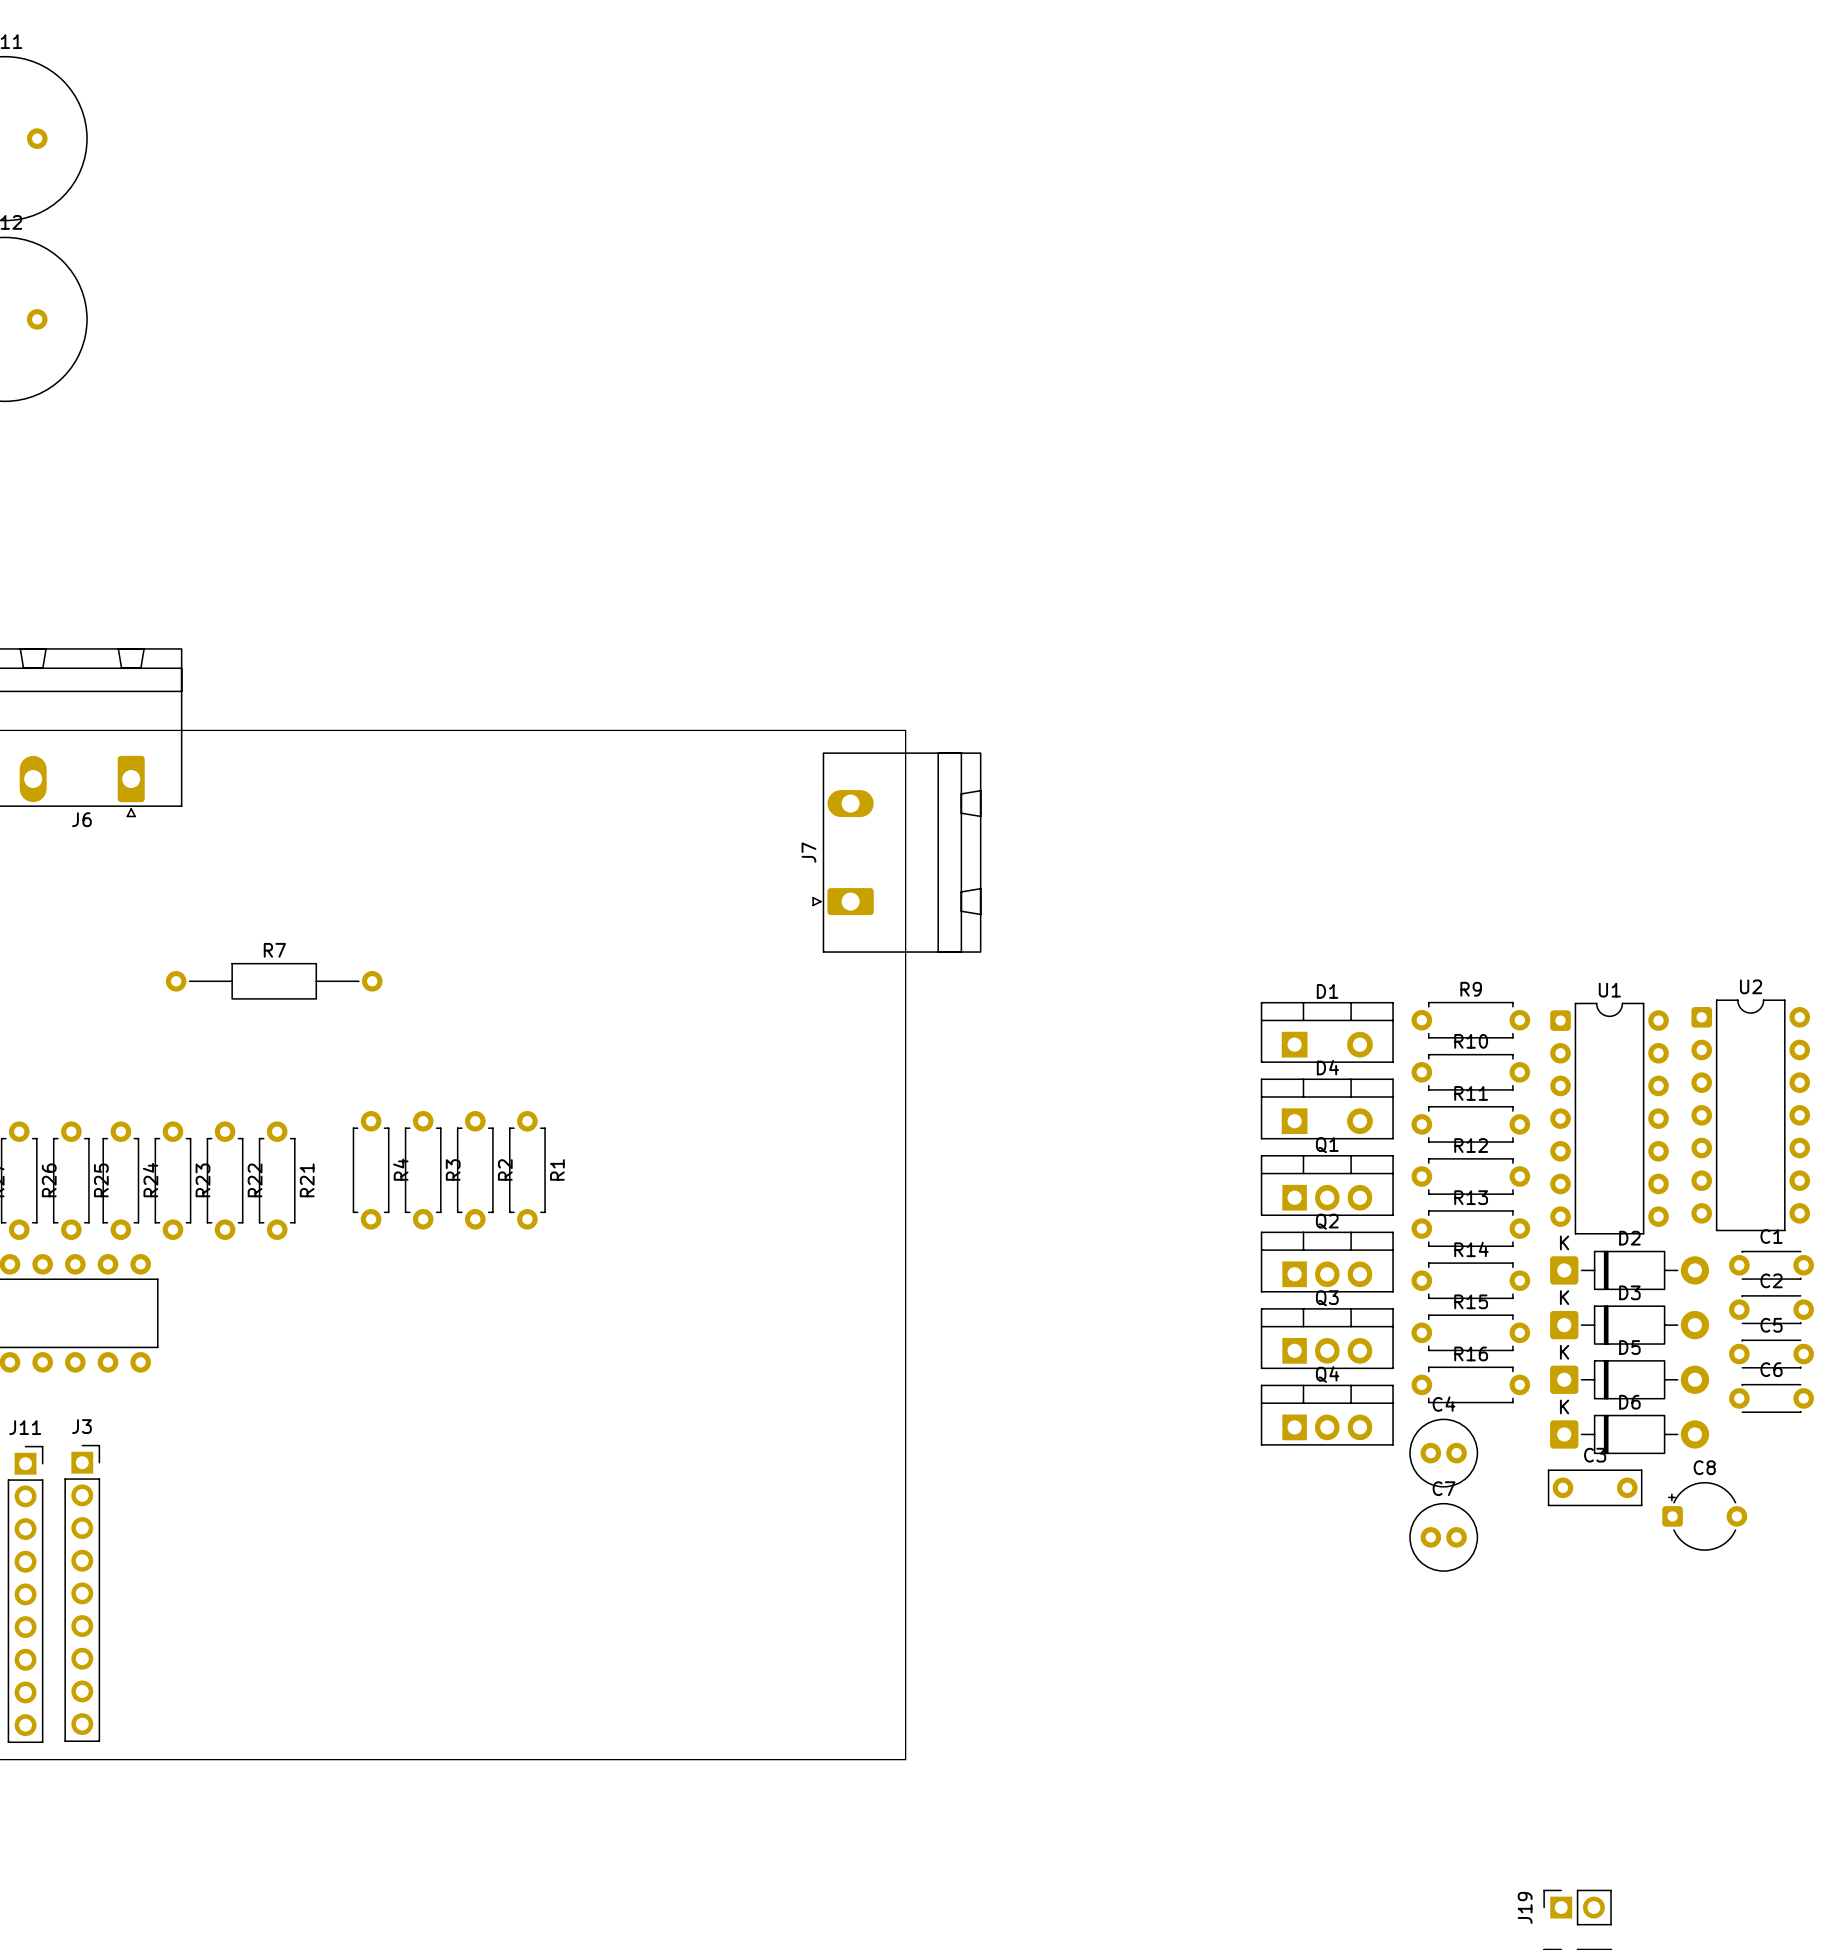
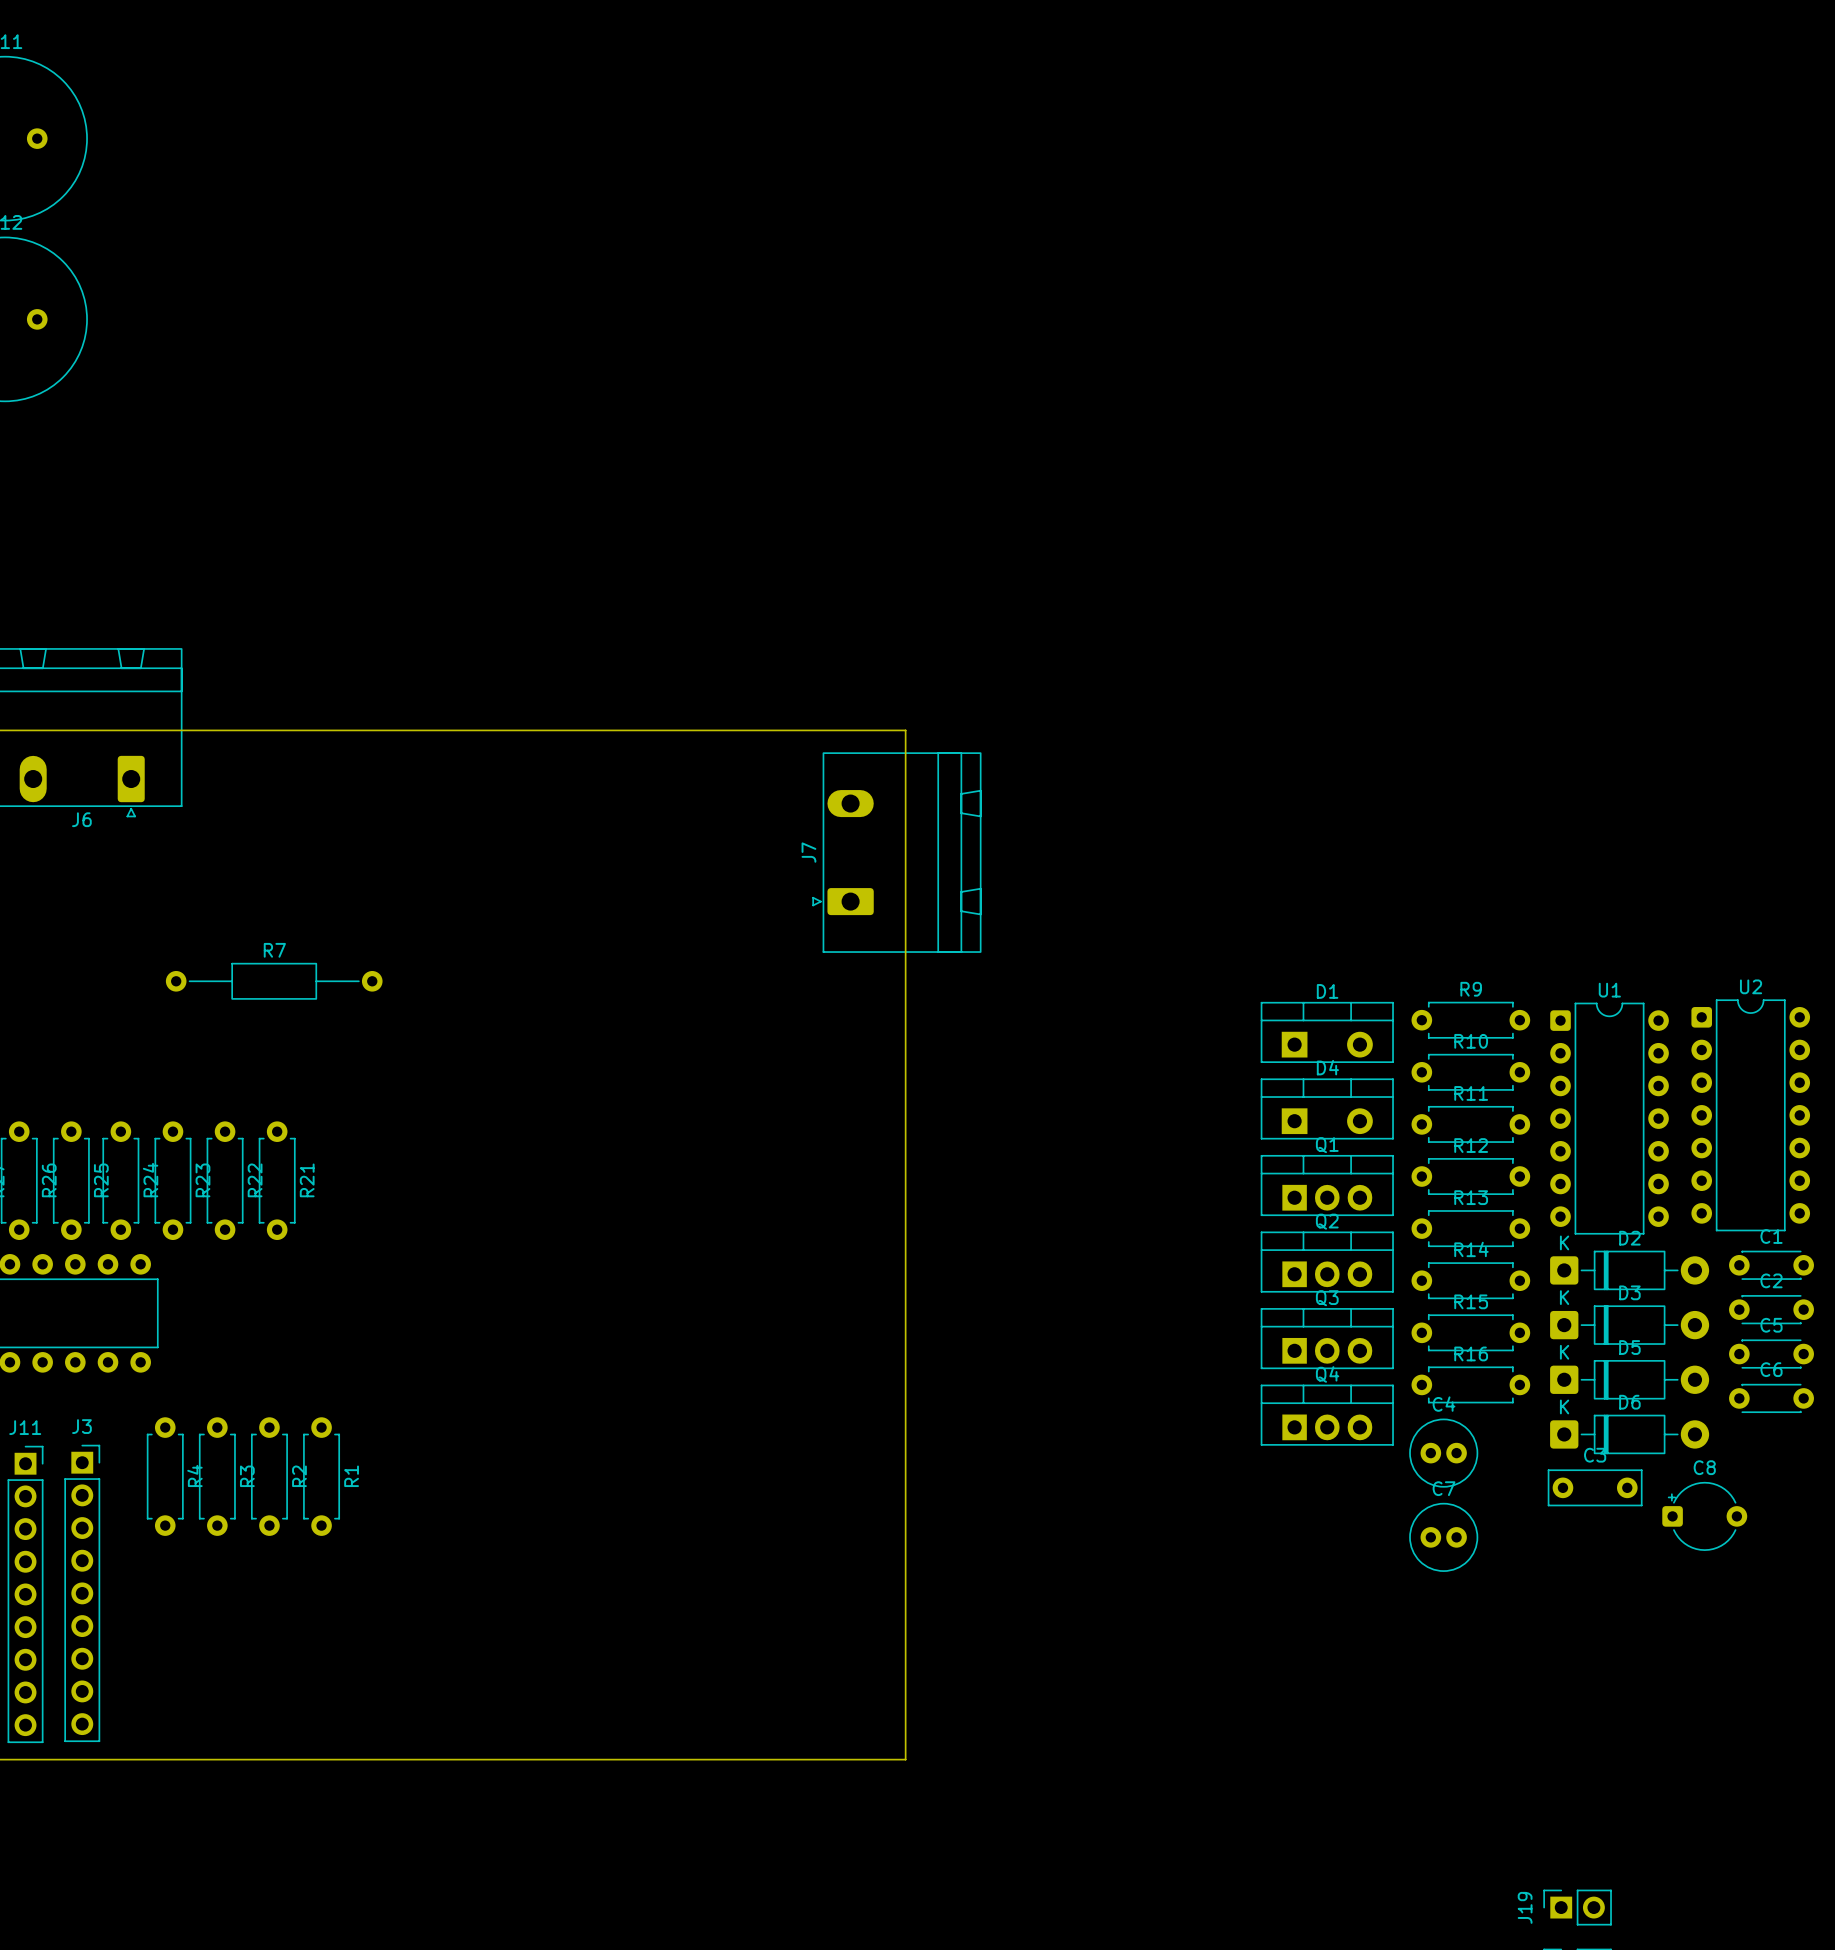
R4 position: (371, 1170) -> (165, 1476)
R3 position: (423, 1170) -> (217, 1476)
R2 position: (475, 1170) -> (269, 1476)
R1 position: (527, 1170) -> (321, 1476)

